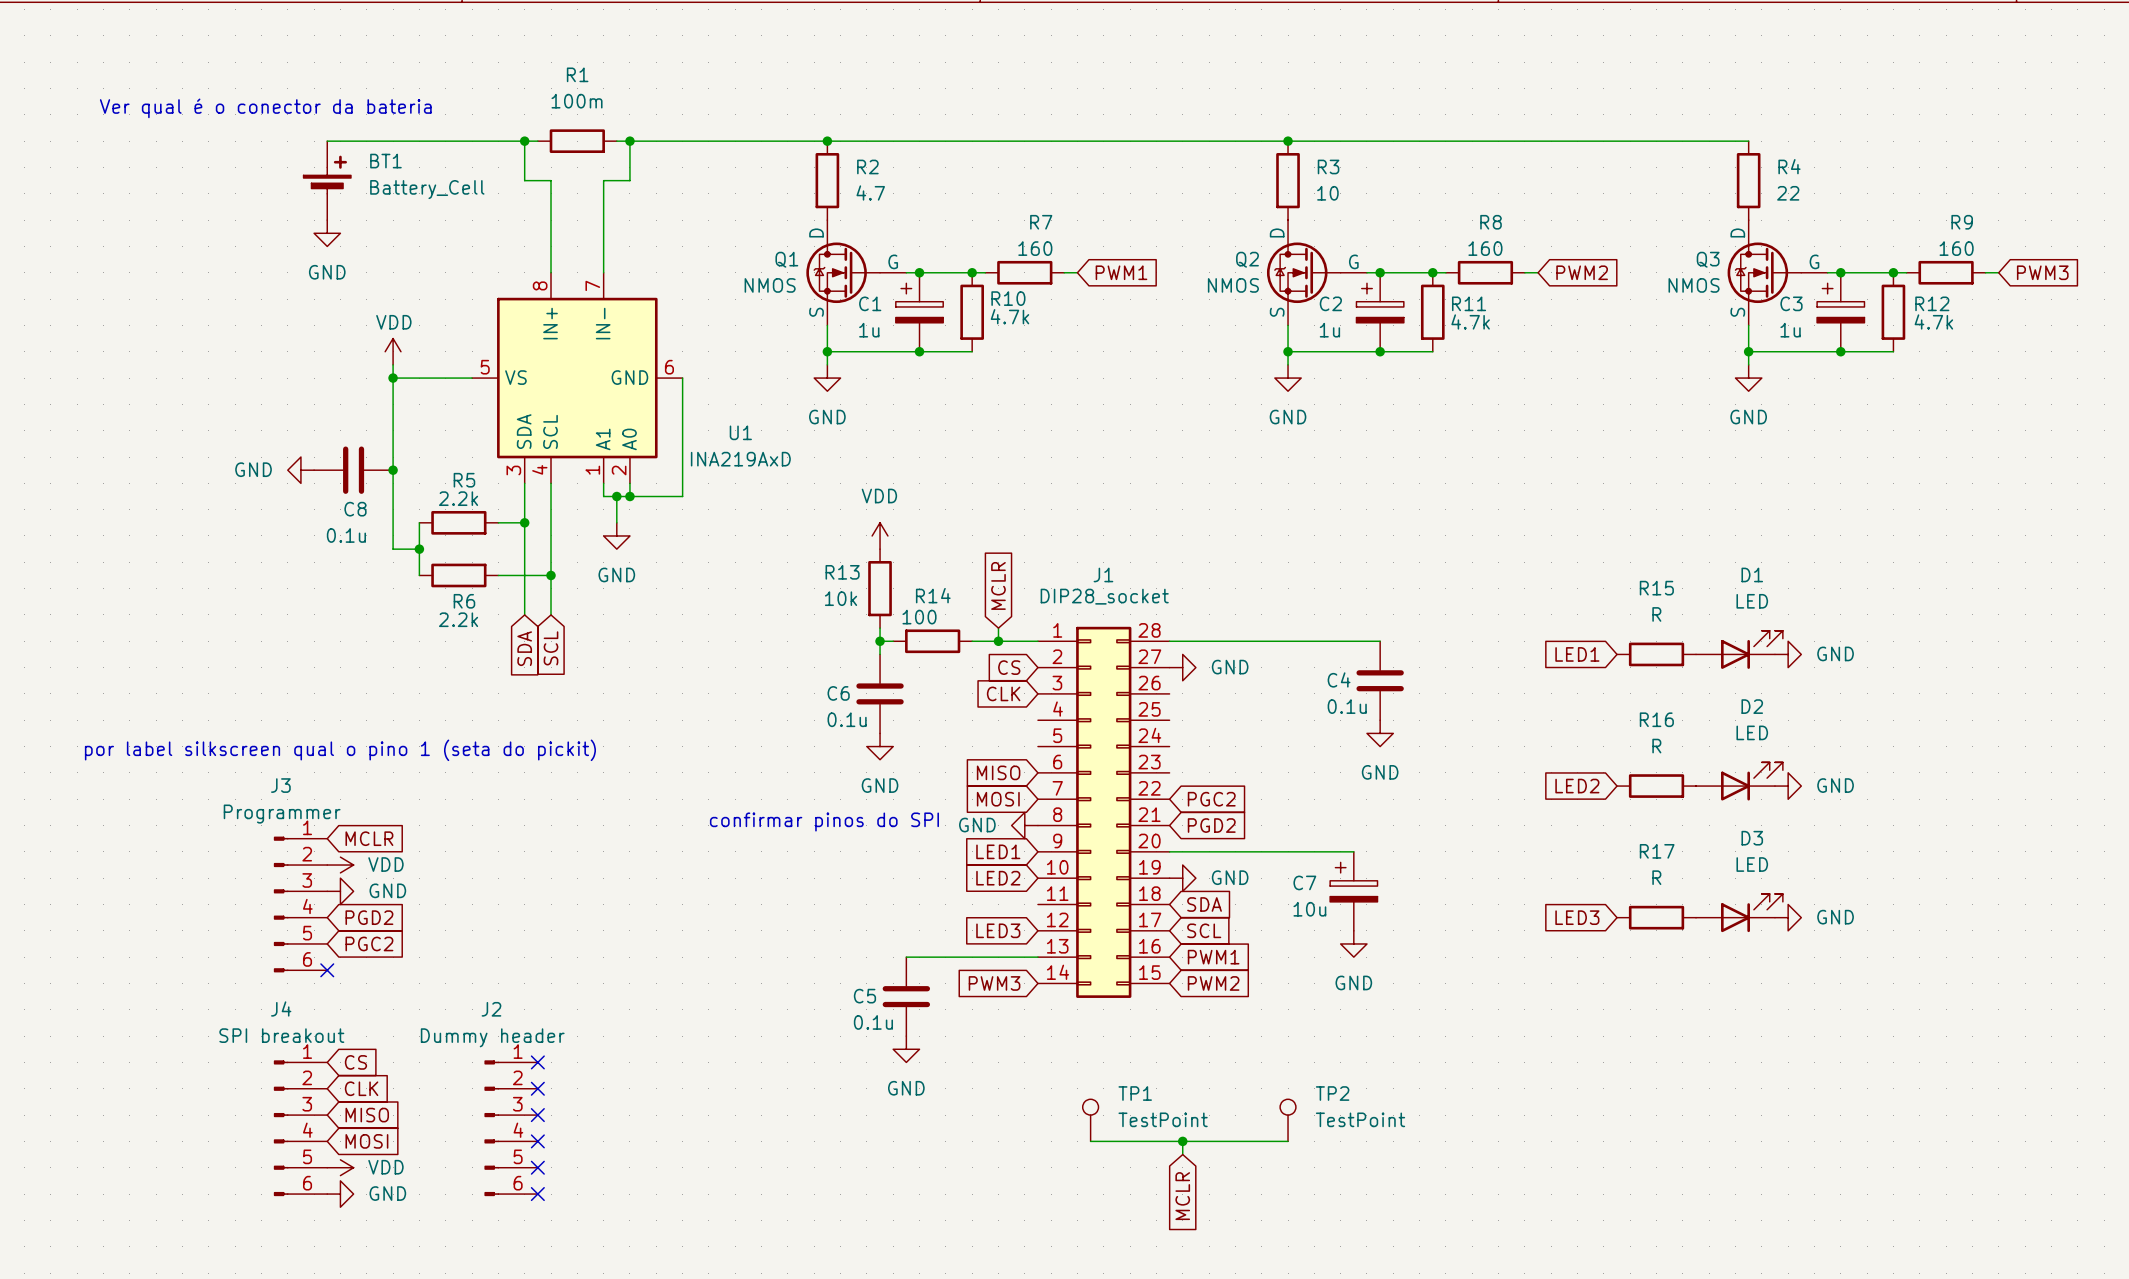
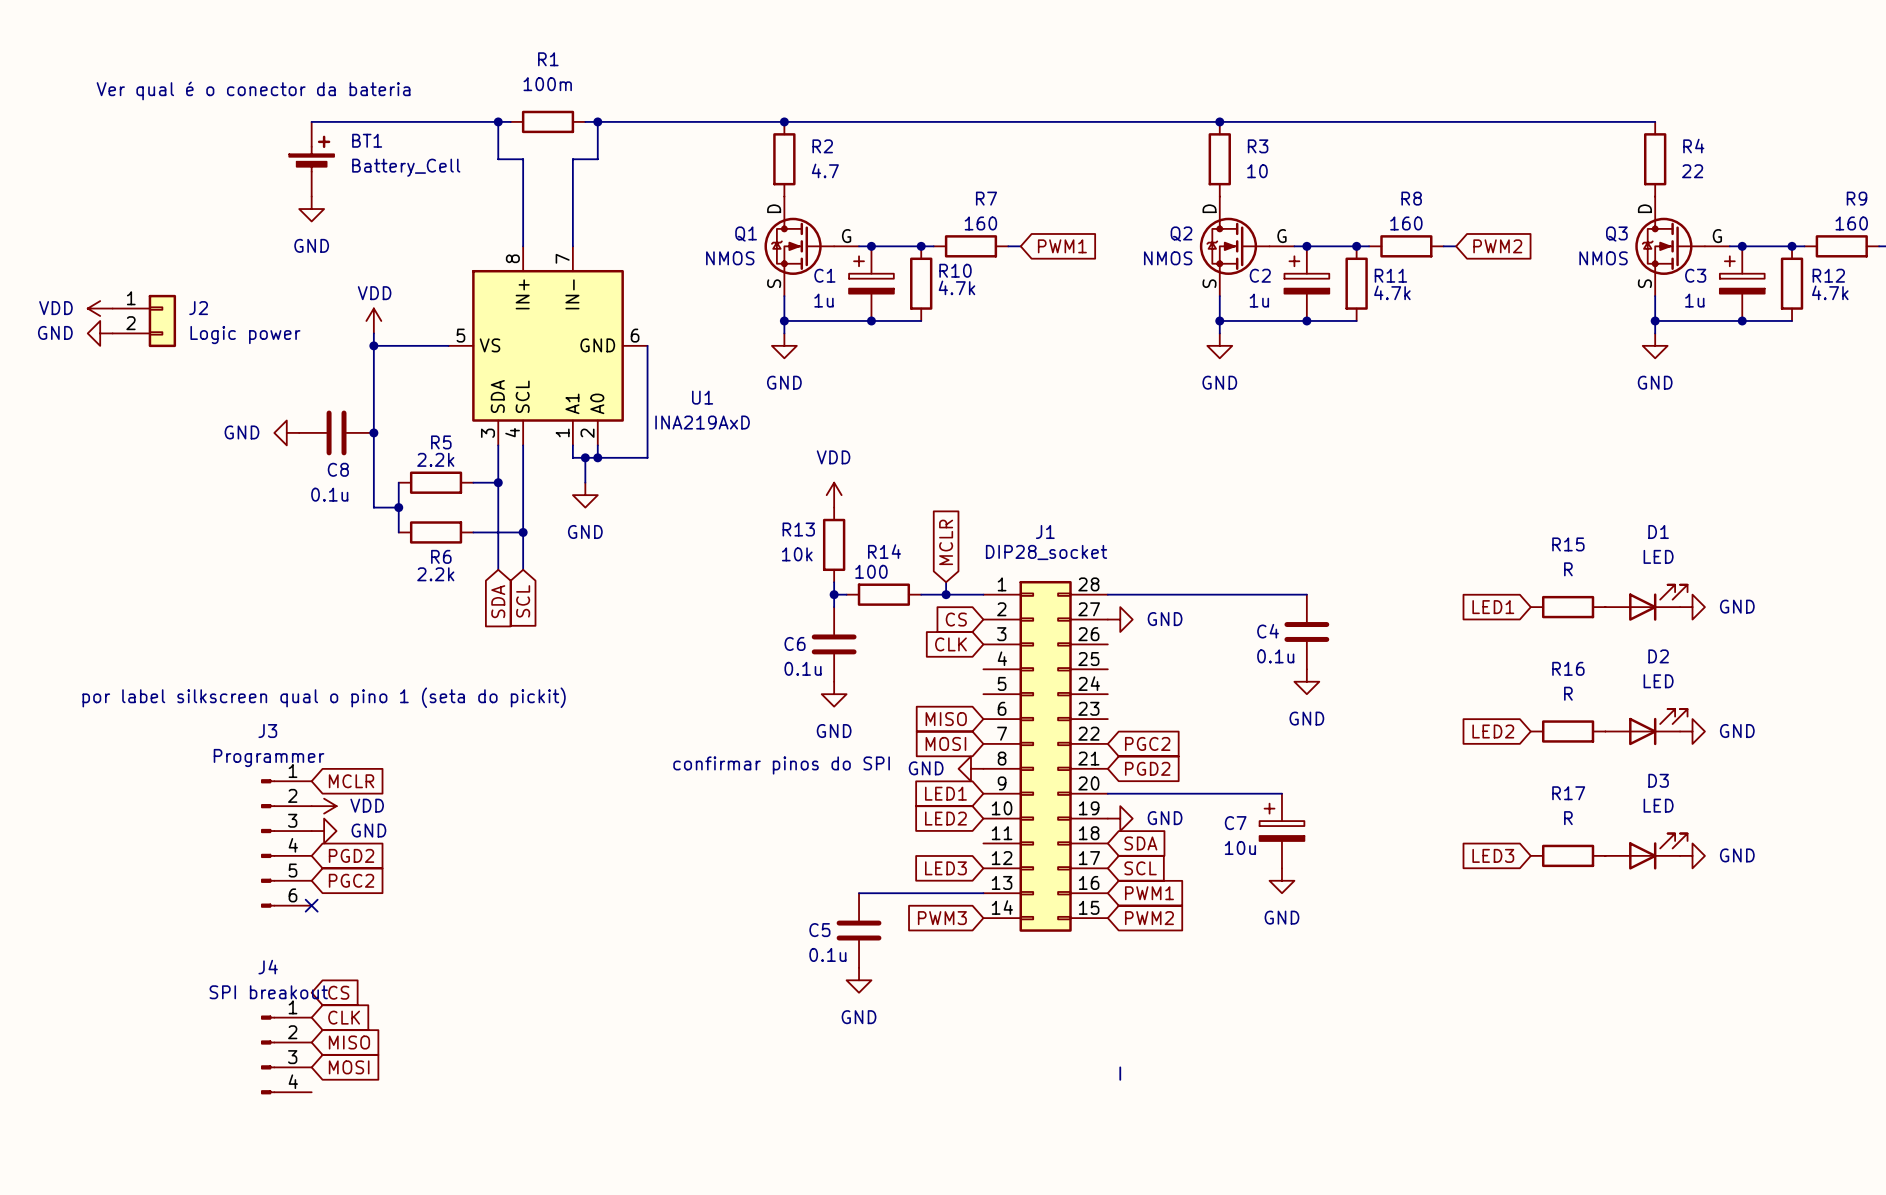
power symbol: none -> VDD (100, 308)
power symbol: none -> GND (100, 333)
J4 name position: J4 (281, 1008) -> J4 (268, 967)
J2 name position: J2 (491, 1009) -> J2 (198, 308)
J4 value position: SPI breakout (281, 1035) -> SPI breakout (268, 992)
J2 value: Dummy header (492, 1037) -> Logic power (245, 335)
J4 symbol: [273, 1060, 328, 1197] -> [261, 1015, 312, 1095]
J2 symbol: [484, 1060, 538, 1197] -> [112, 294, 177, 348]
no-connect mark: (537, 1062) -> none
no-connect mark: (537, 1088) -> none
no-connect mark: (537, 1115) -> none
TP1: TestPoint (1090, 1120) -> none
TP2: TestPoint (1288, 1120) -> none
no-connect mark: (537, 1141) -> none
wire: (1090, 1141) (1288, 1141) -> none
junction: (1182, 1141) -> none
power symbol: VDD (340, 1167) -> none
no-connect mark: (537, 1167) -> none
power symbol: GND (340, 1194) -> none
no-connect mark: (537, 1194) -> none
global label: MCLR (1182, 1196) -> none

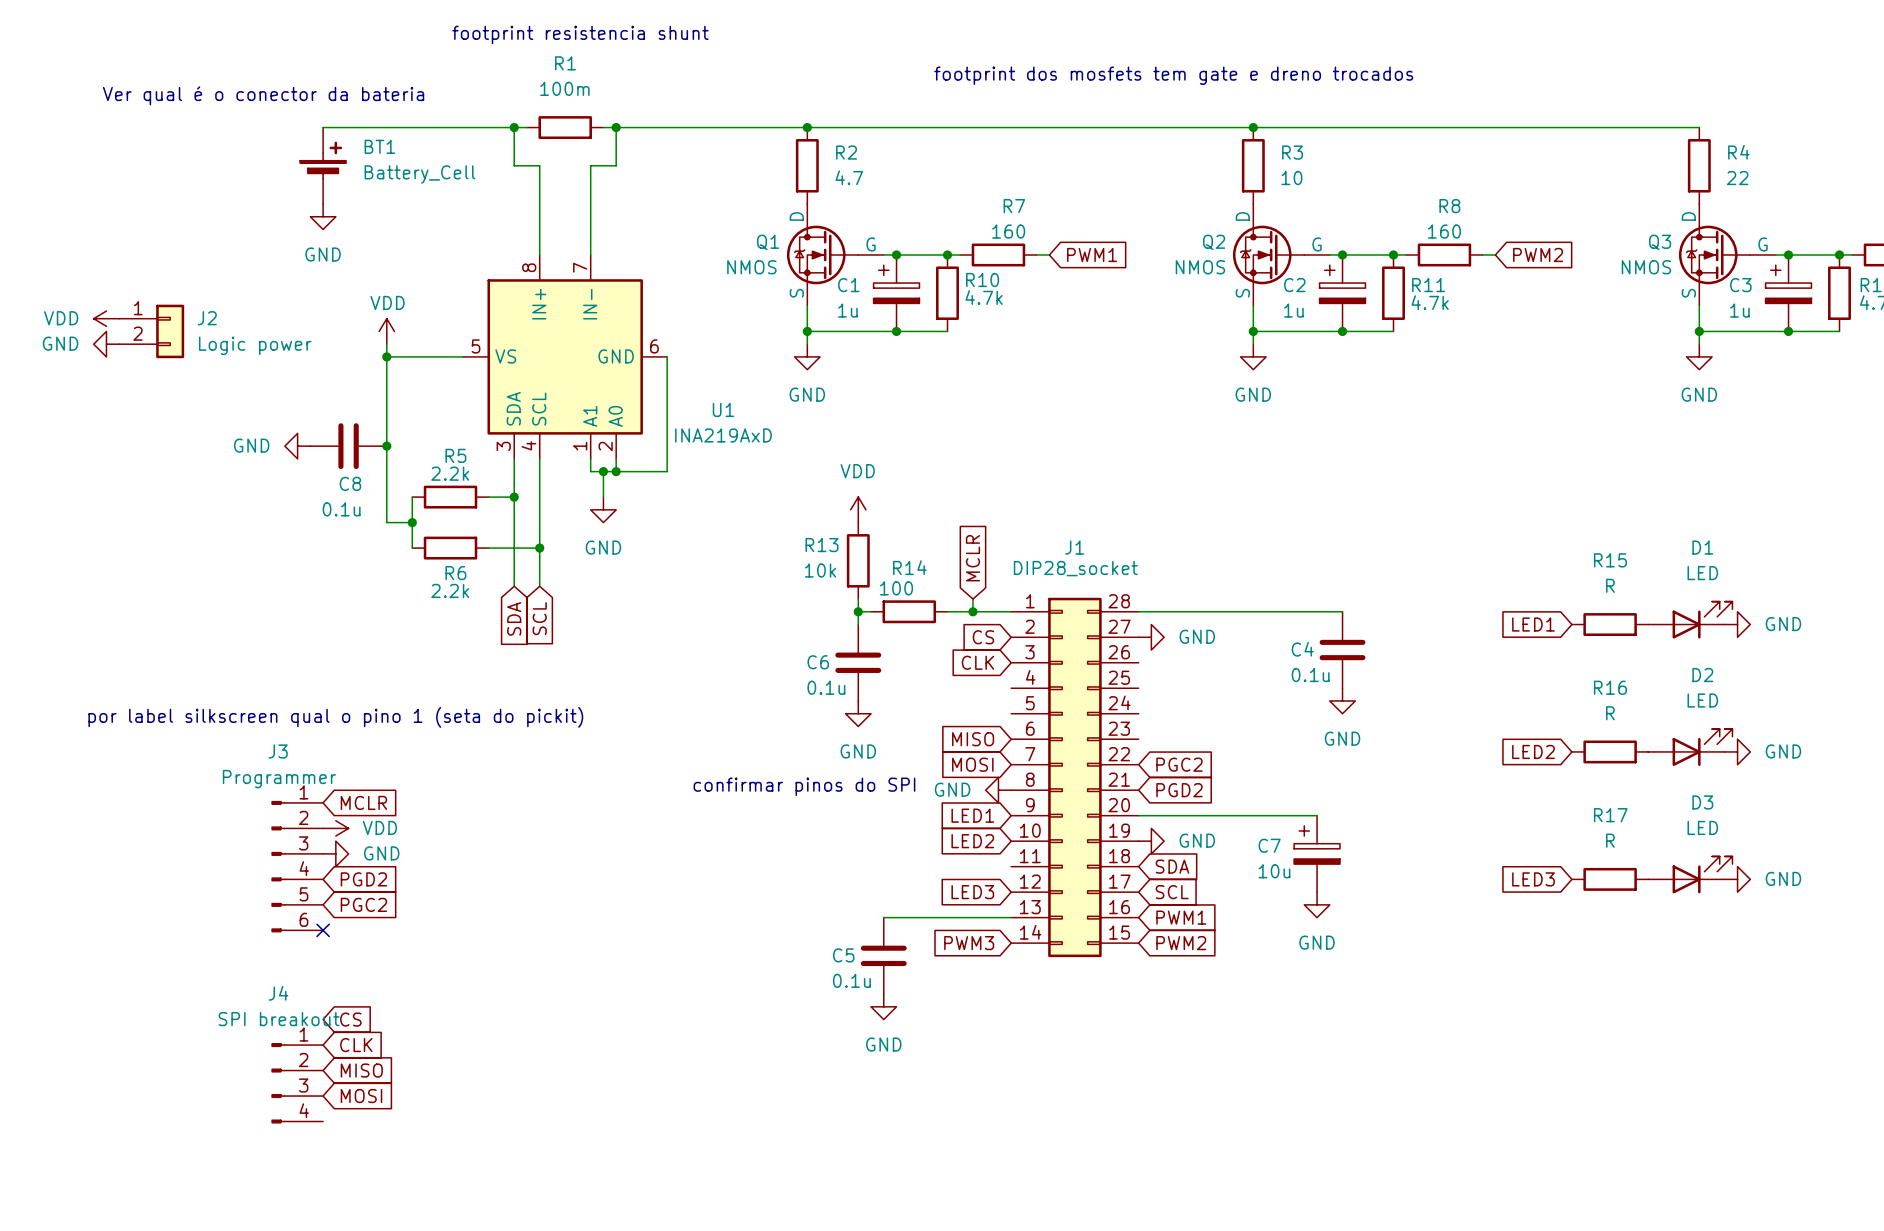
text: none -> footprint resistencia shunt (580, 34)
text: none -> footprint dos mosfets tem gate e dreno trocados (1173, 75)
wire: (1120, 1067) (1120, 1079) -> none

